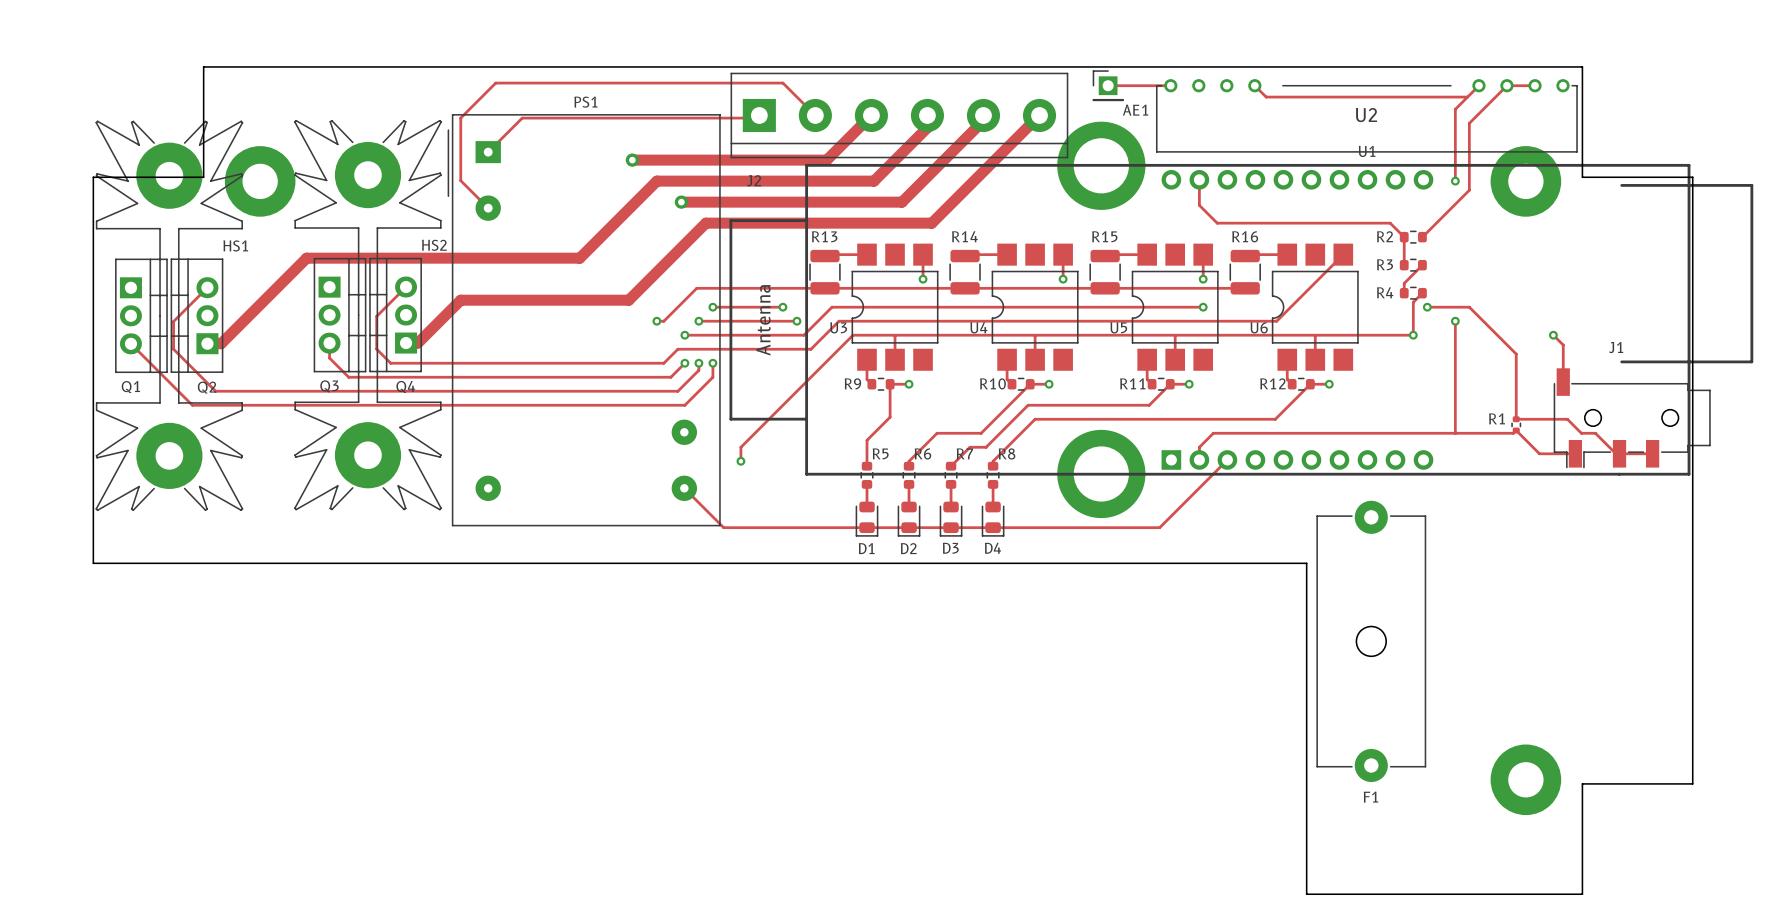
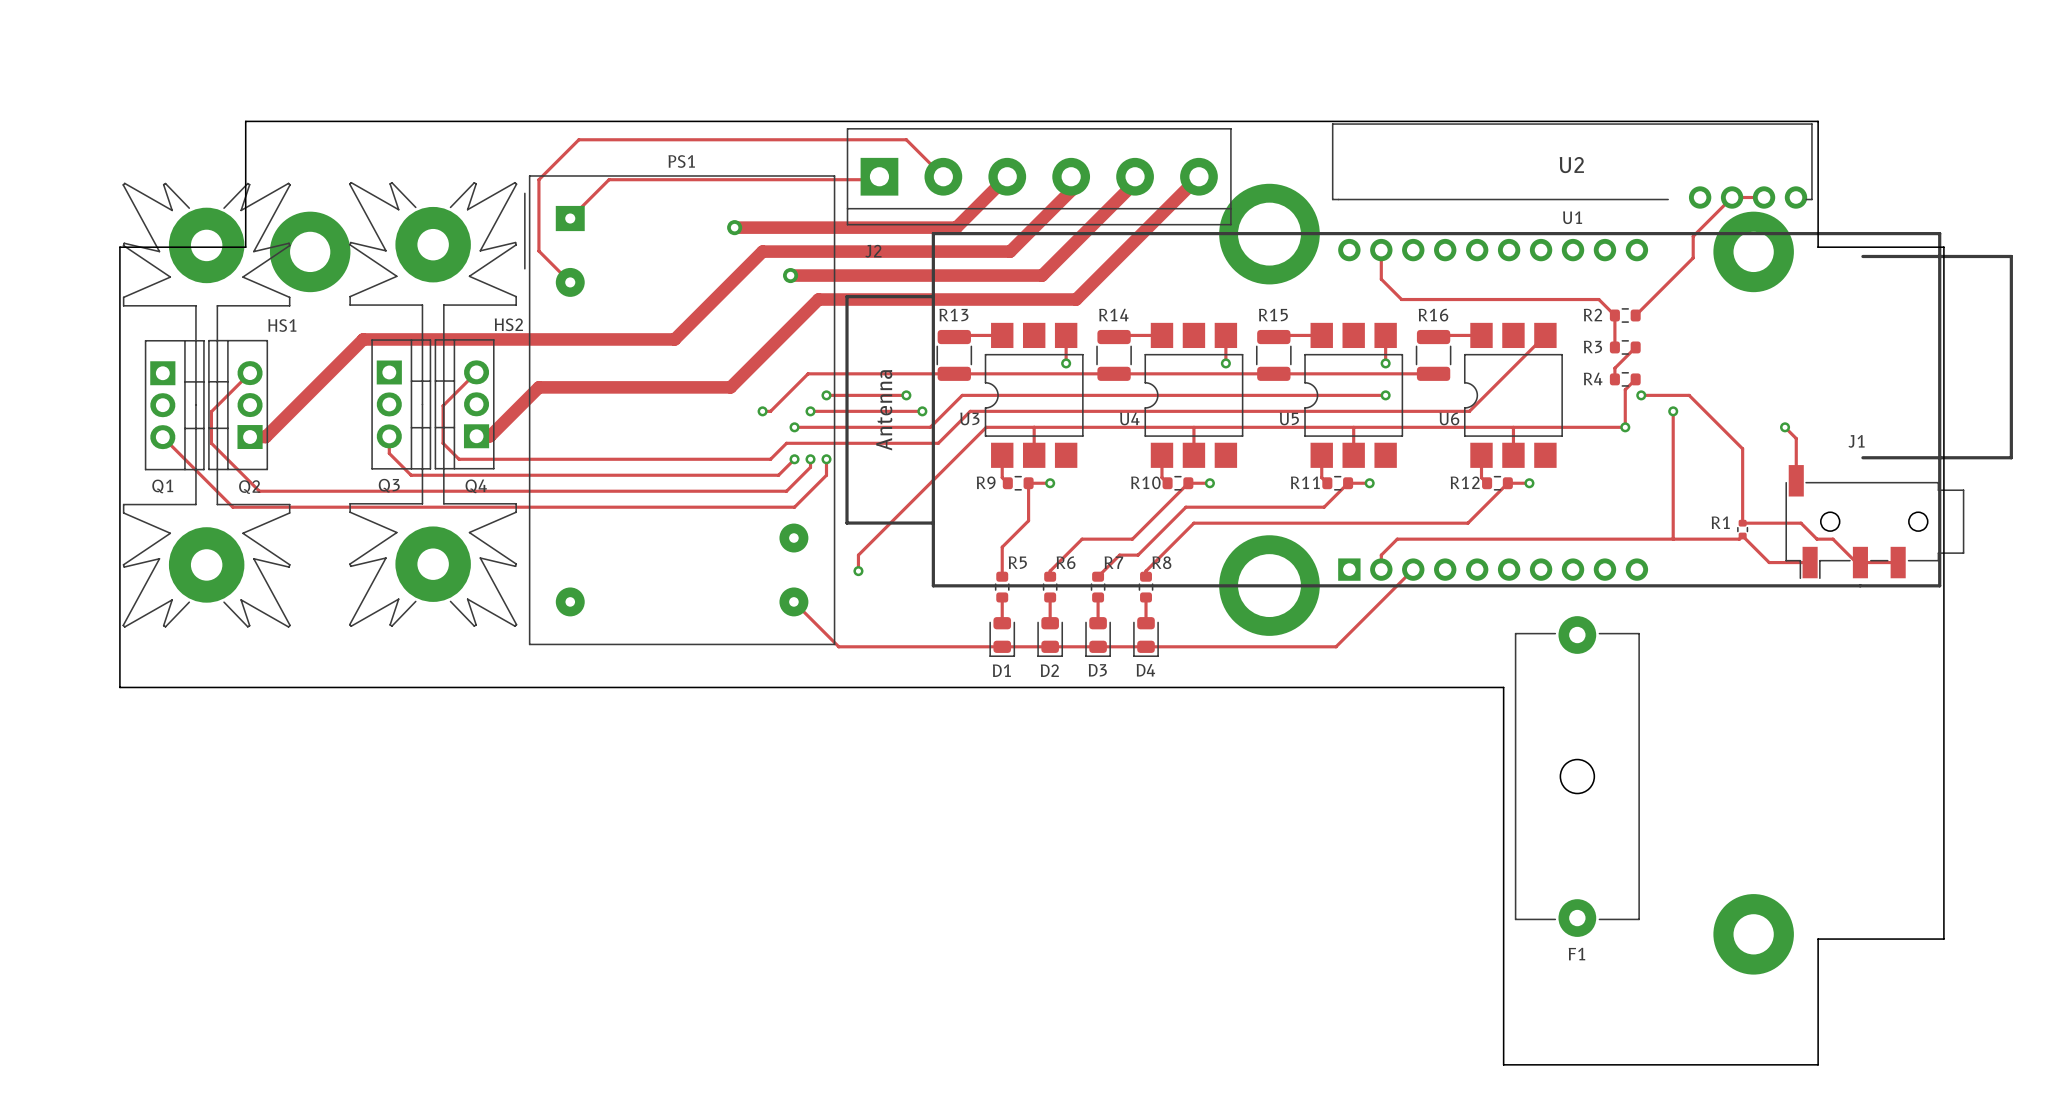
U2 footprint: [1156, 79, 1578, 153] -> [1332, 123, 1813, 209]
track: (1108, 85) (1170, 85) -> none
AE1: (1108, 85) -> none
track: (1254, 85) (1266, 97) (1467, 97) -> none
track: (1478, 85) (1455, 109) (1455, 181) -> none
track: (1534, 85) (1506, 85) (1469, 123) (1469, 190) -> (1764, 197) (1732, 197) (1693, 236) (1693, 257) (1689, 261)
via: (1455, 181) -> none

